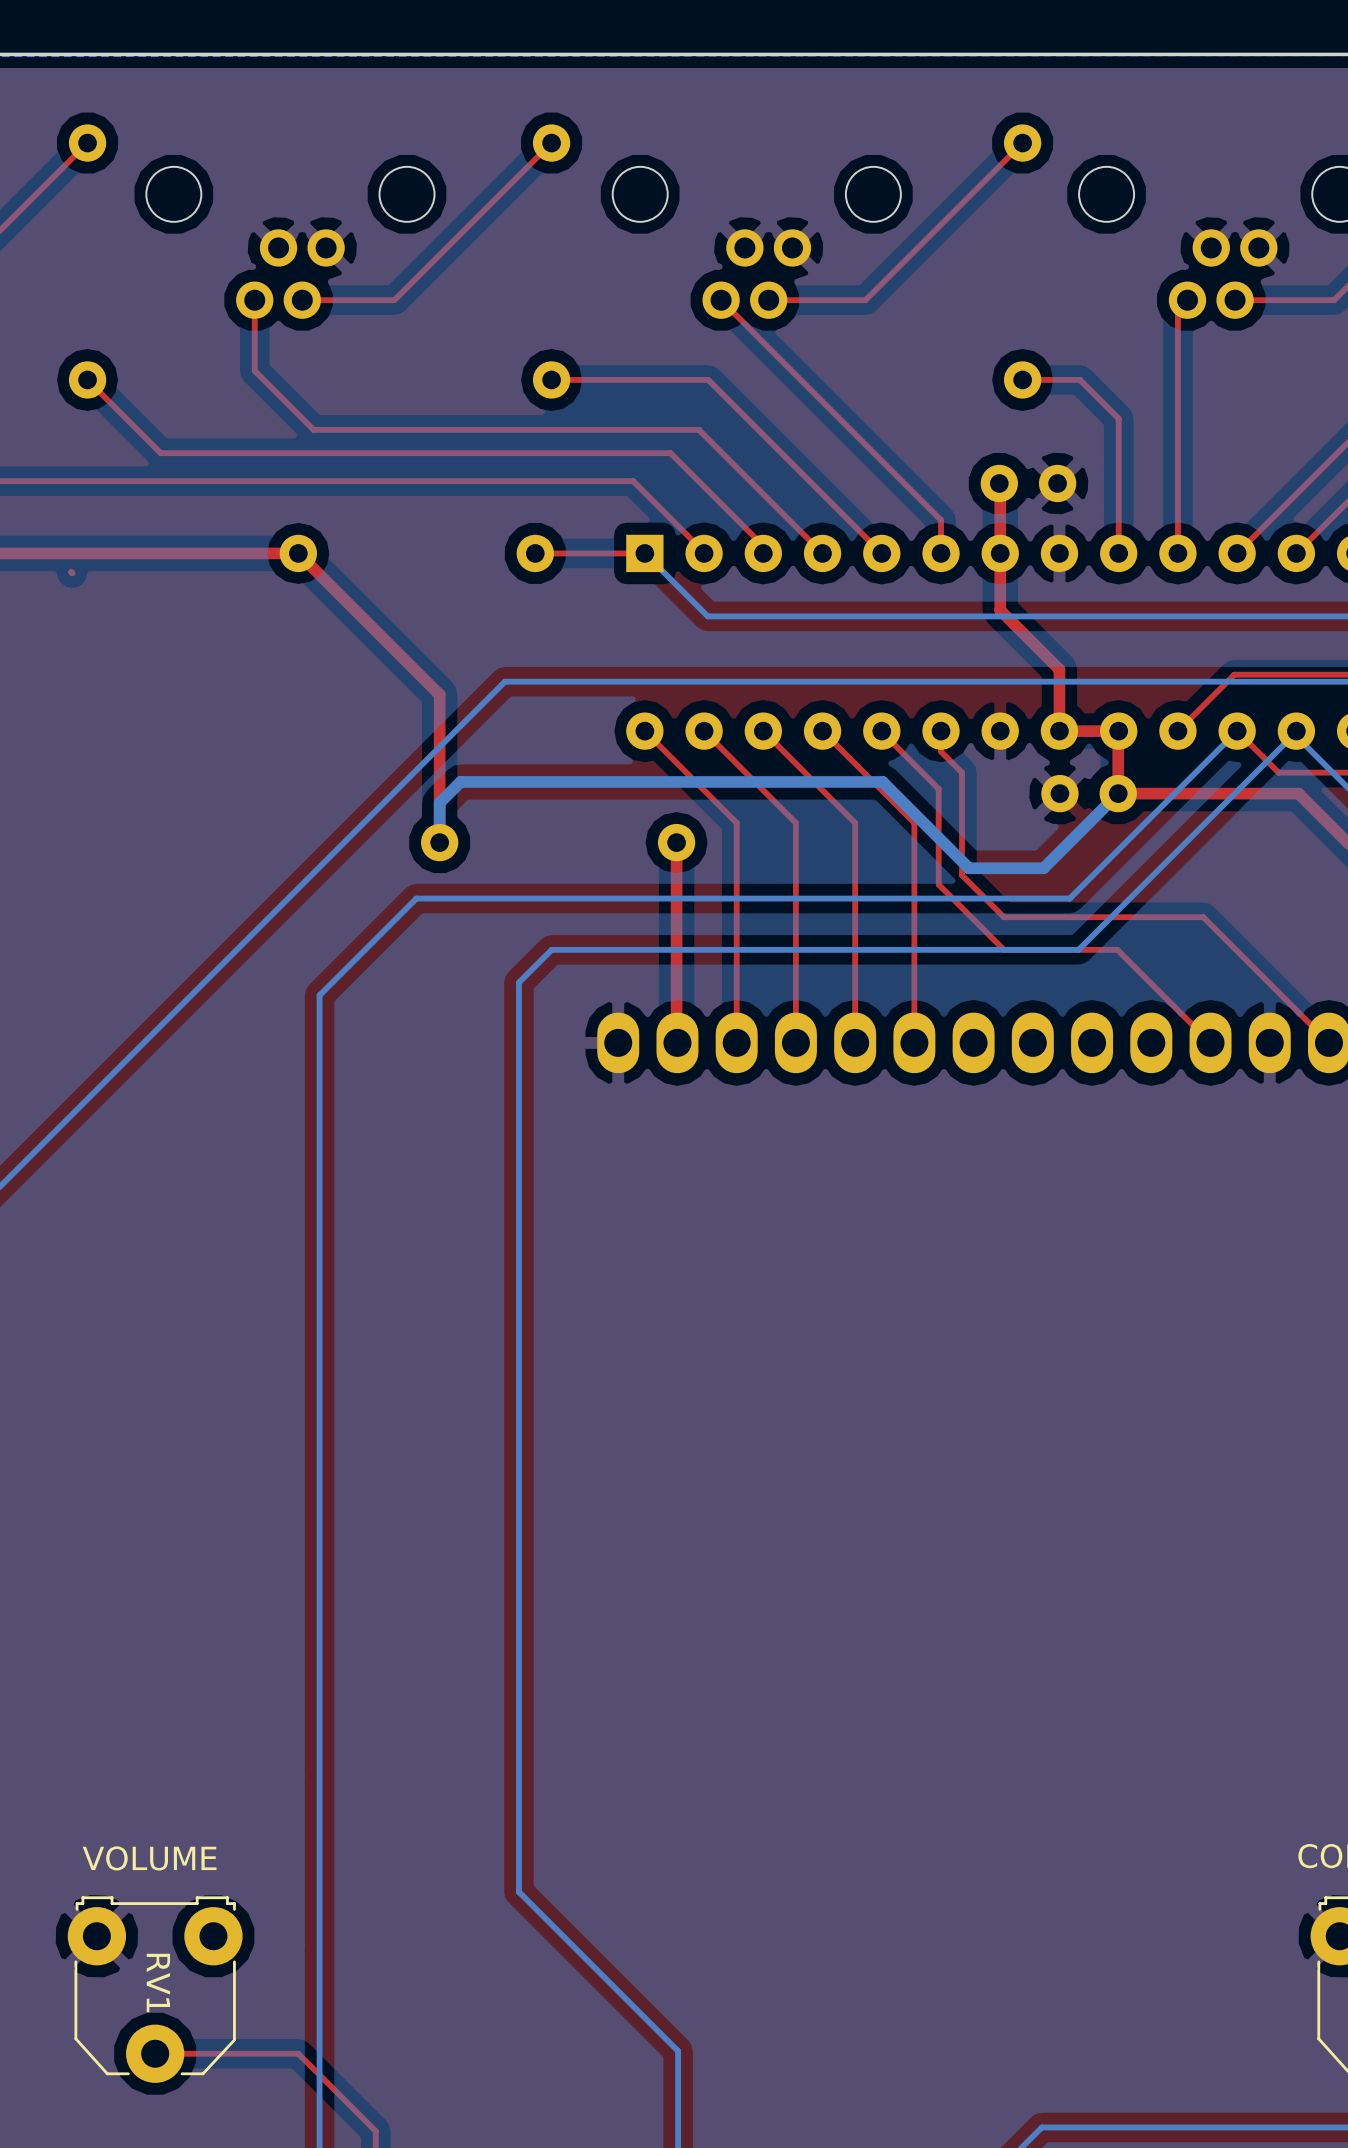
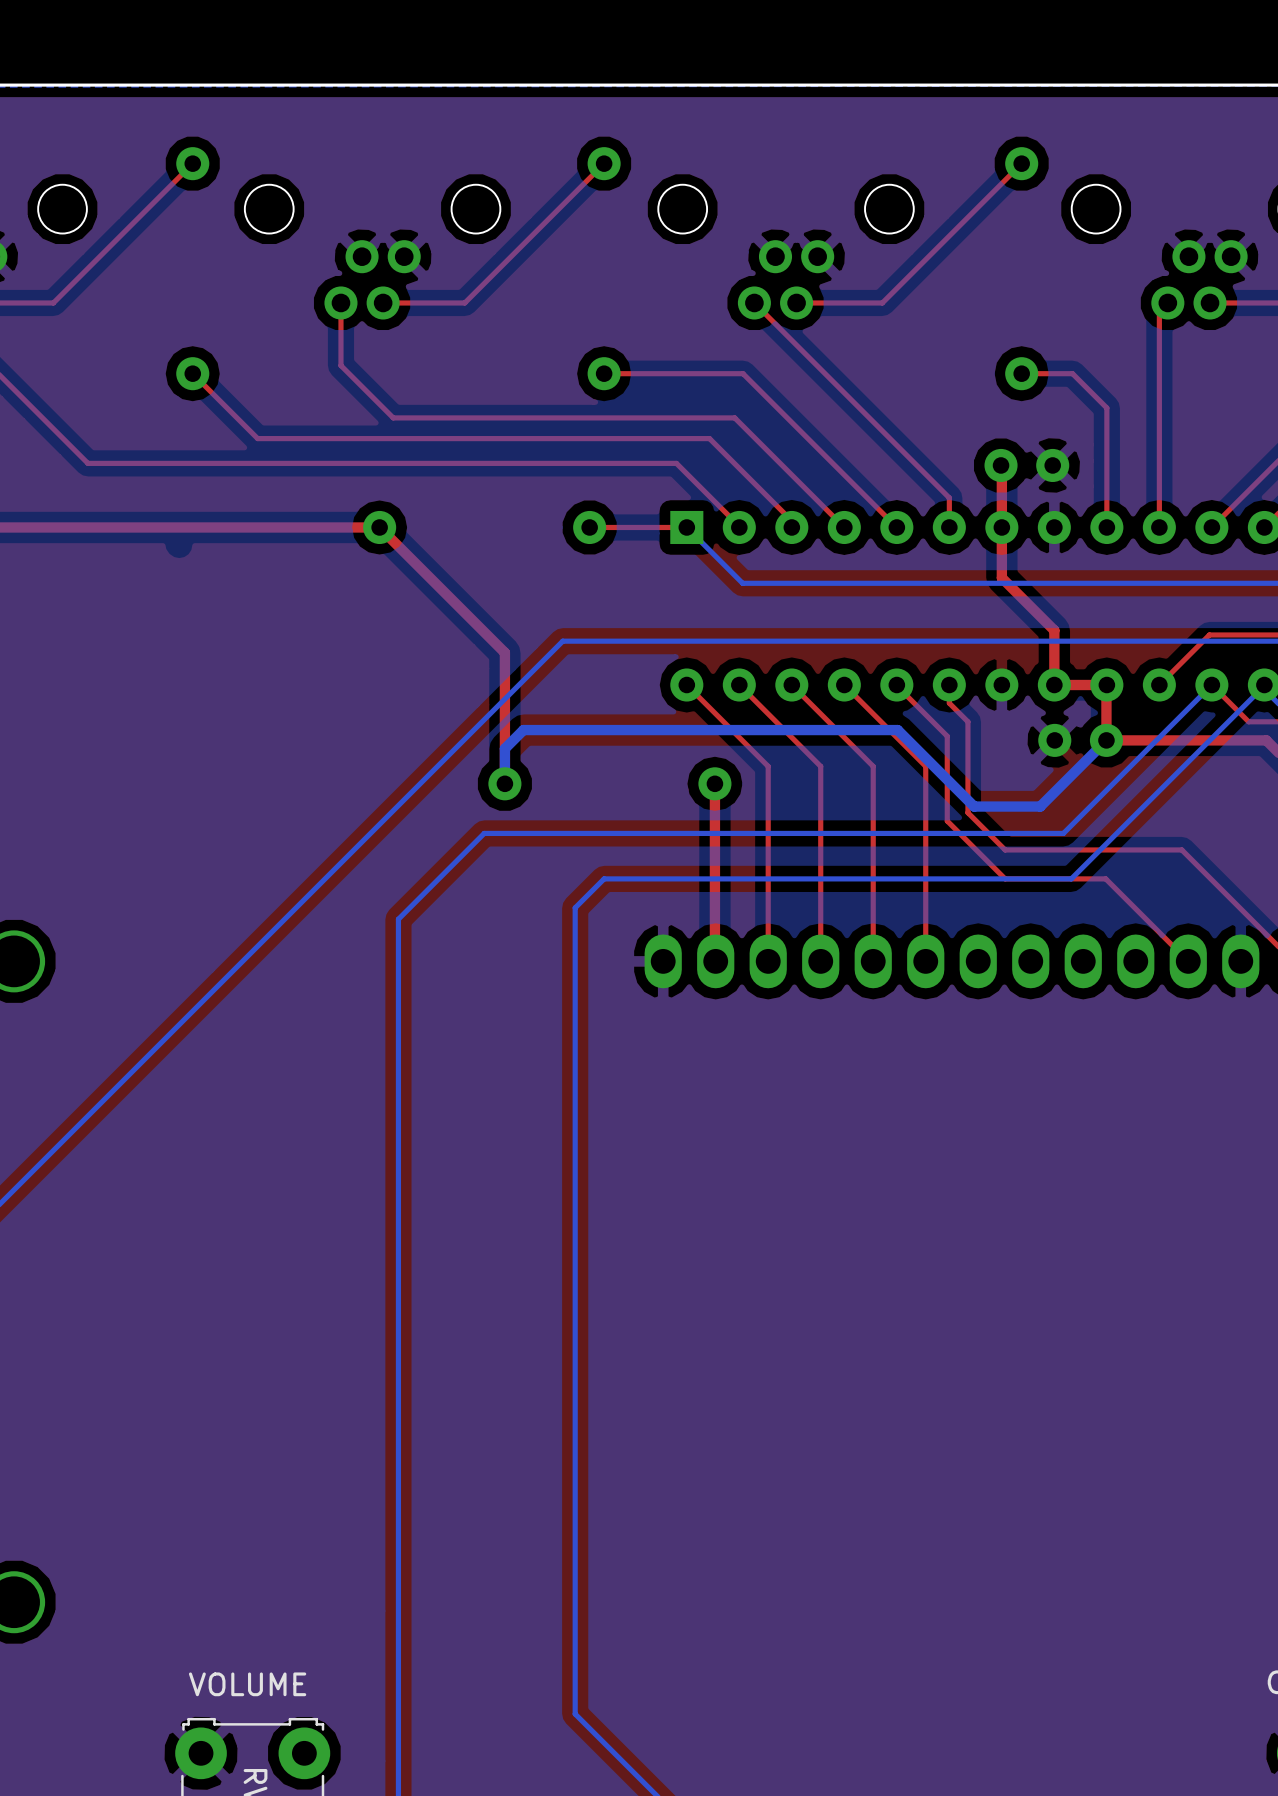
top track: (71, 572) (72, 573) -> none

